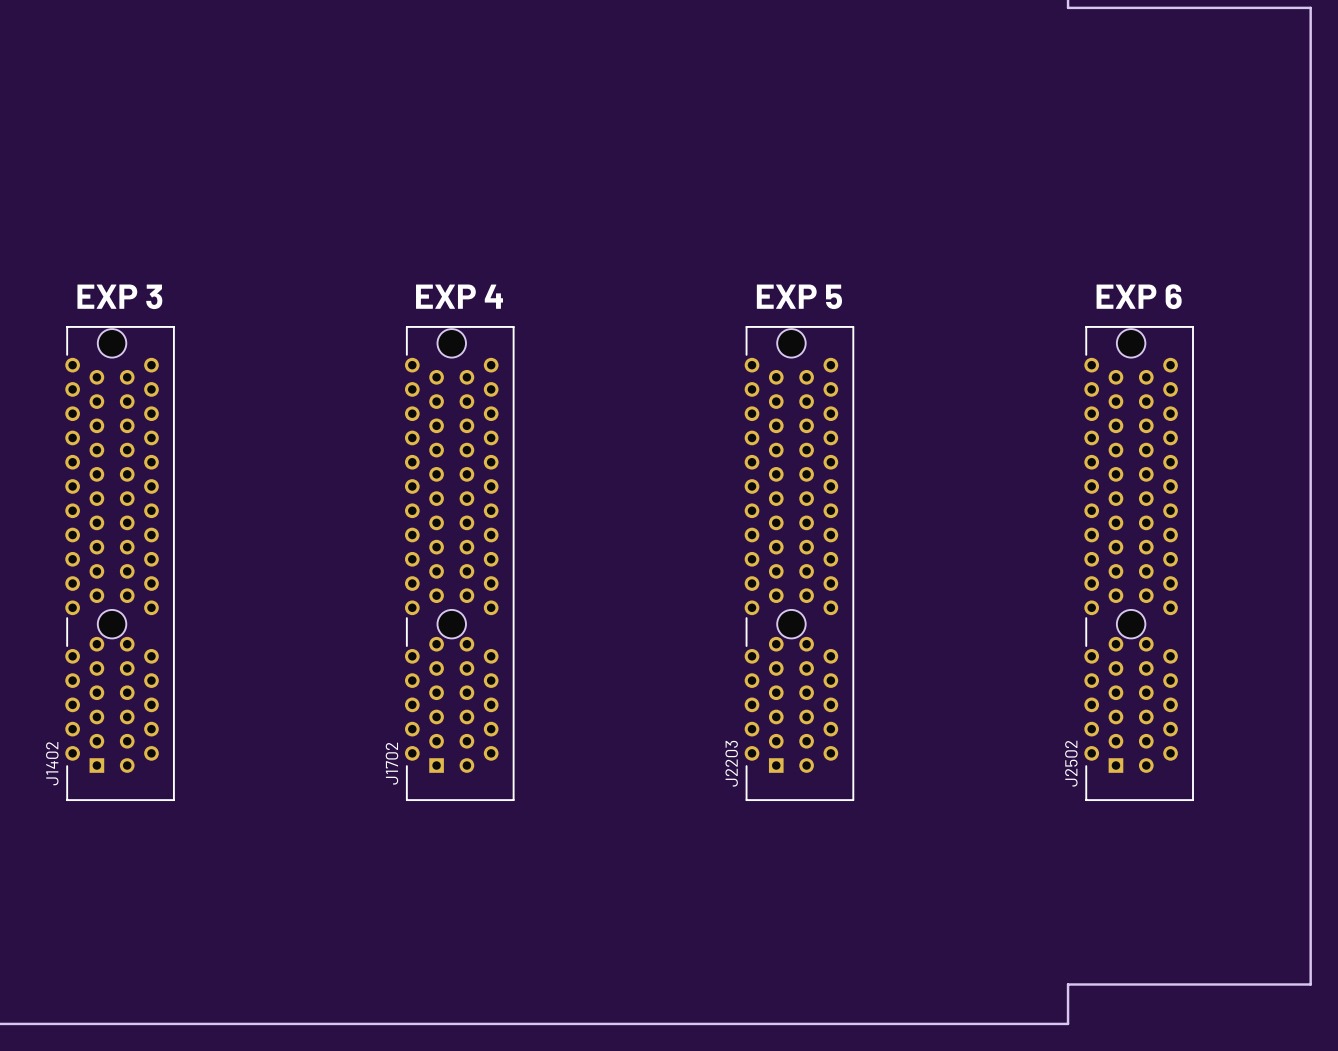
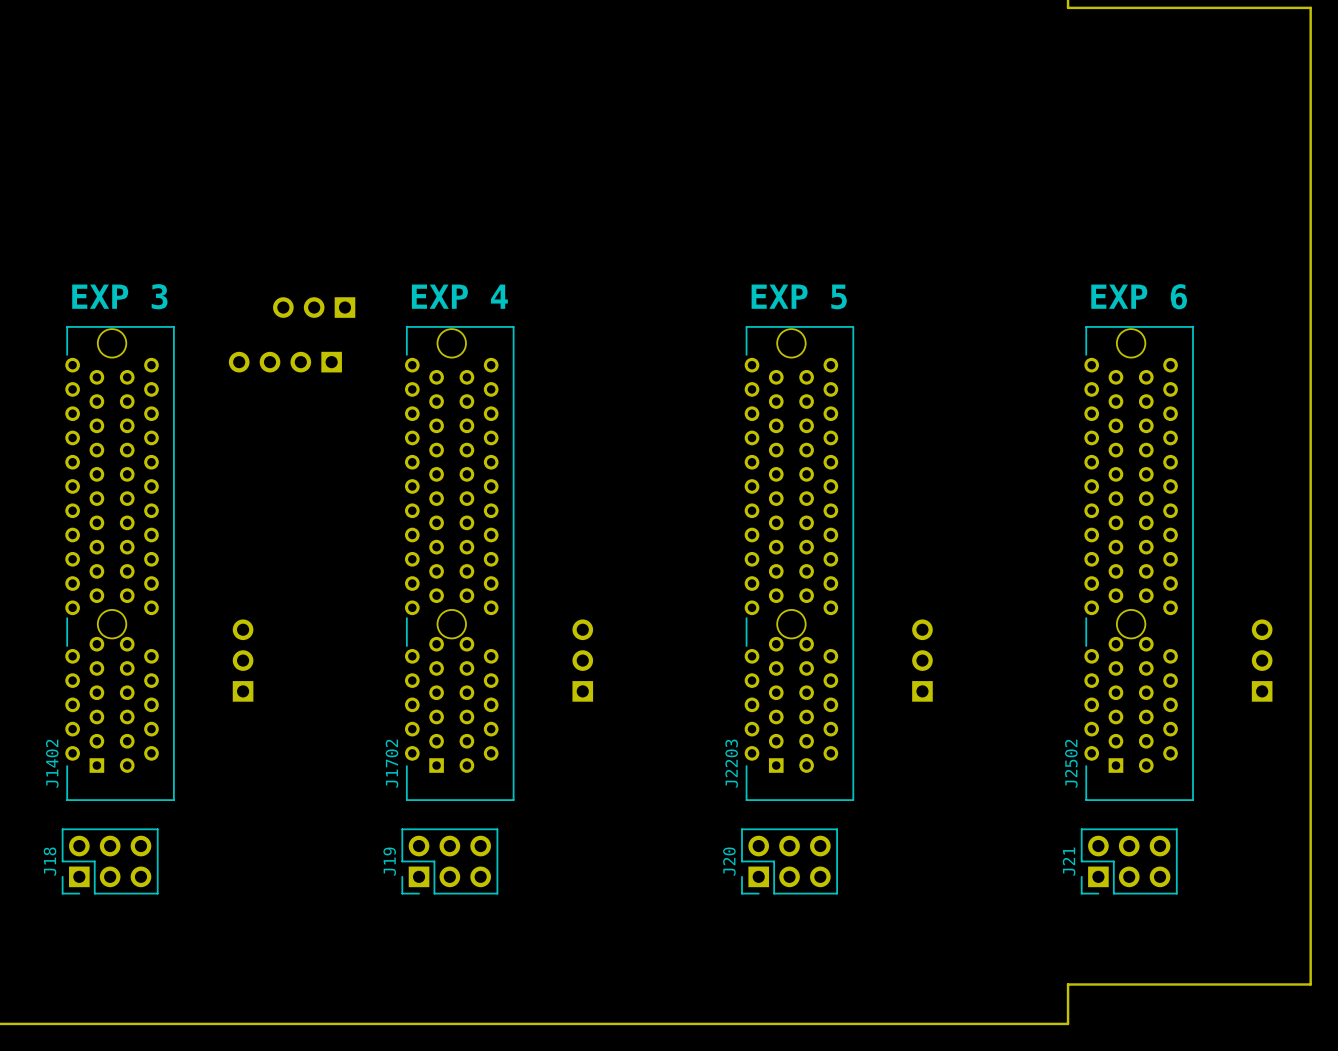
part: none -> (314, 307)
part: none -> (285, 362)
part: none -> (243, 660)
part: none -> (582, 660)
part: none -> (922, 660)
part: none -> (1262, 660)
J18: none -> (110, 861)
J19: none -> (449, 861)
J20: none -> (789, 861)
J21: none -> (1129, 861)

